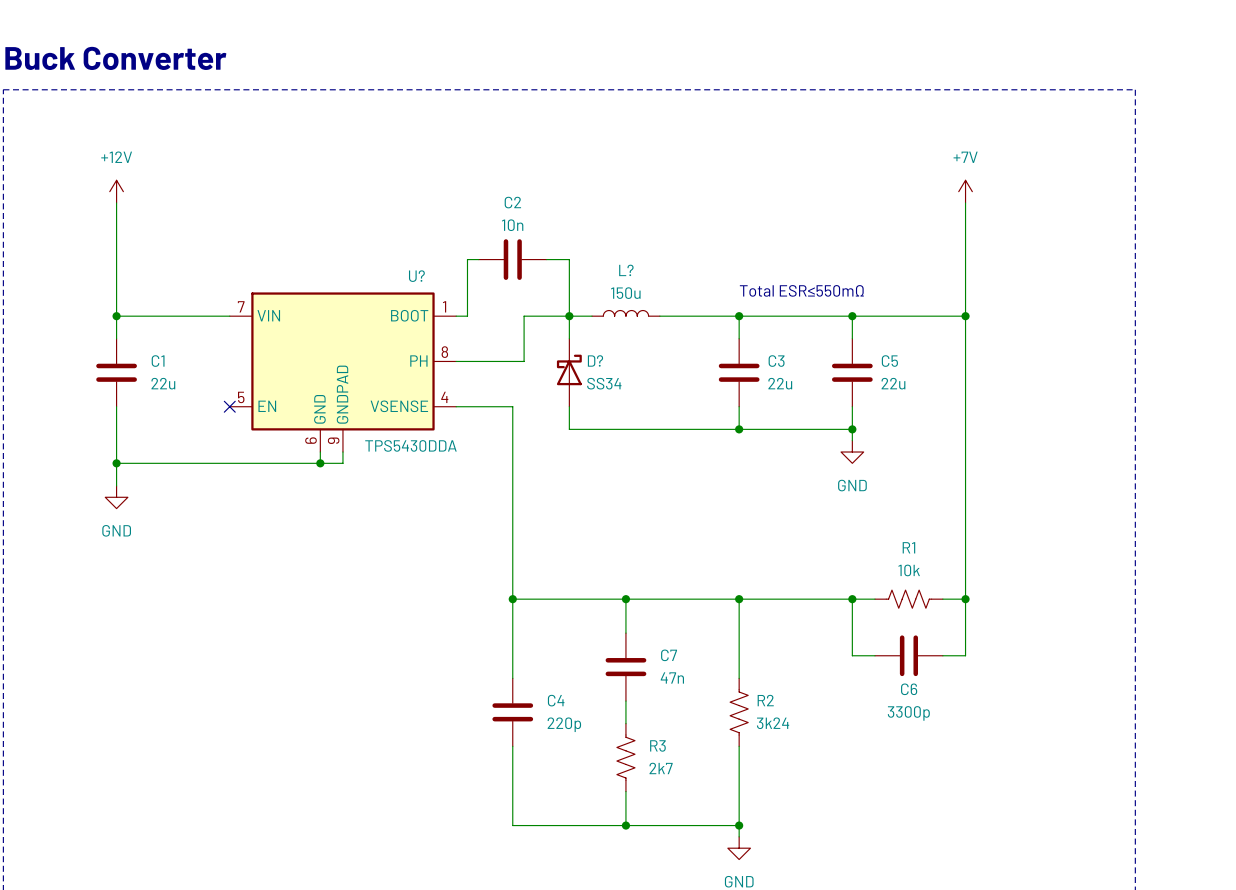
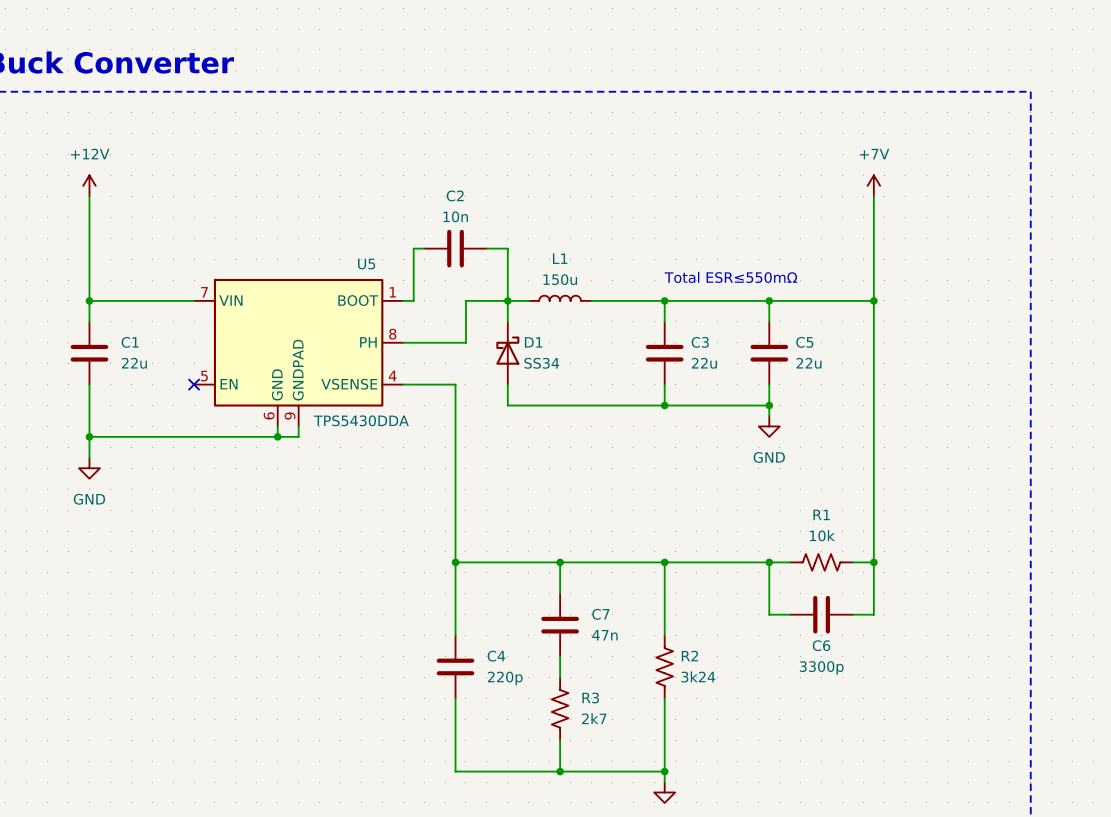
L? name: L? (626, 270) -> L1 (560, 258)
U? name: U? (416, 276) -> U5 (366, 264)
D? name: D? (595, 360) -> D1 (533, 342)

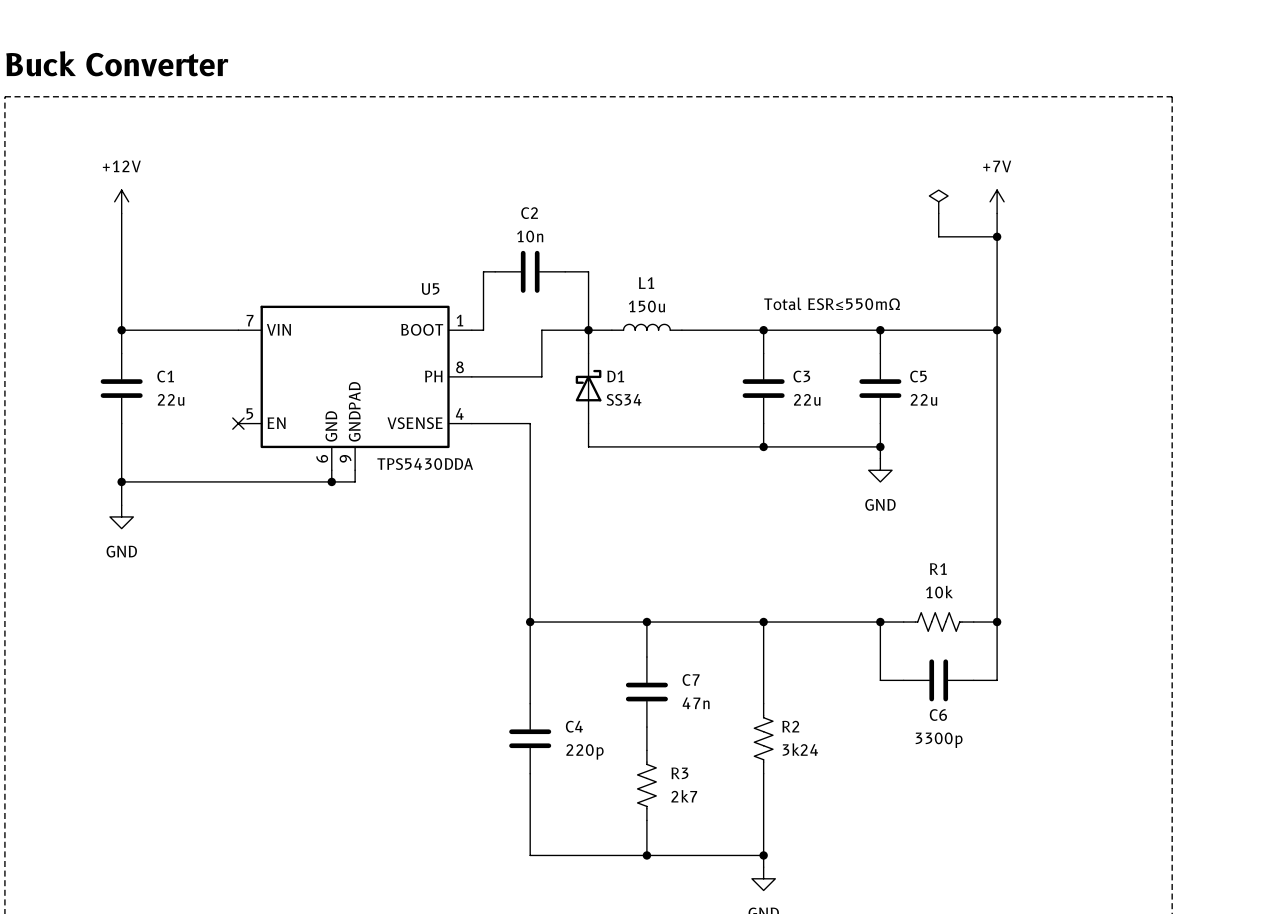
power symbol: none -> (938, 201)
wire: none -> (938, 213) (938, 236) (997, 236)
junction: none -> (997, 236)

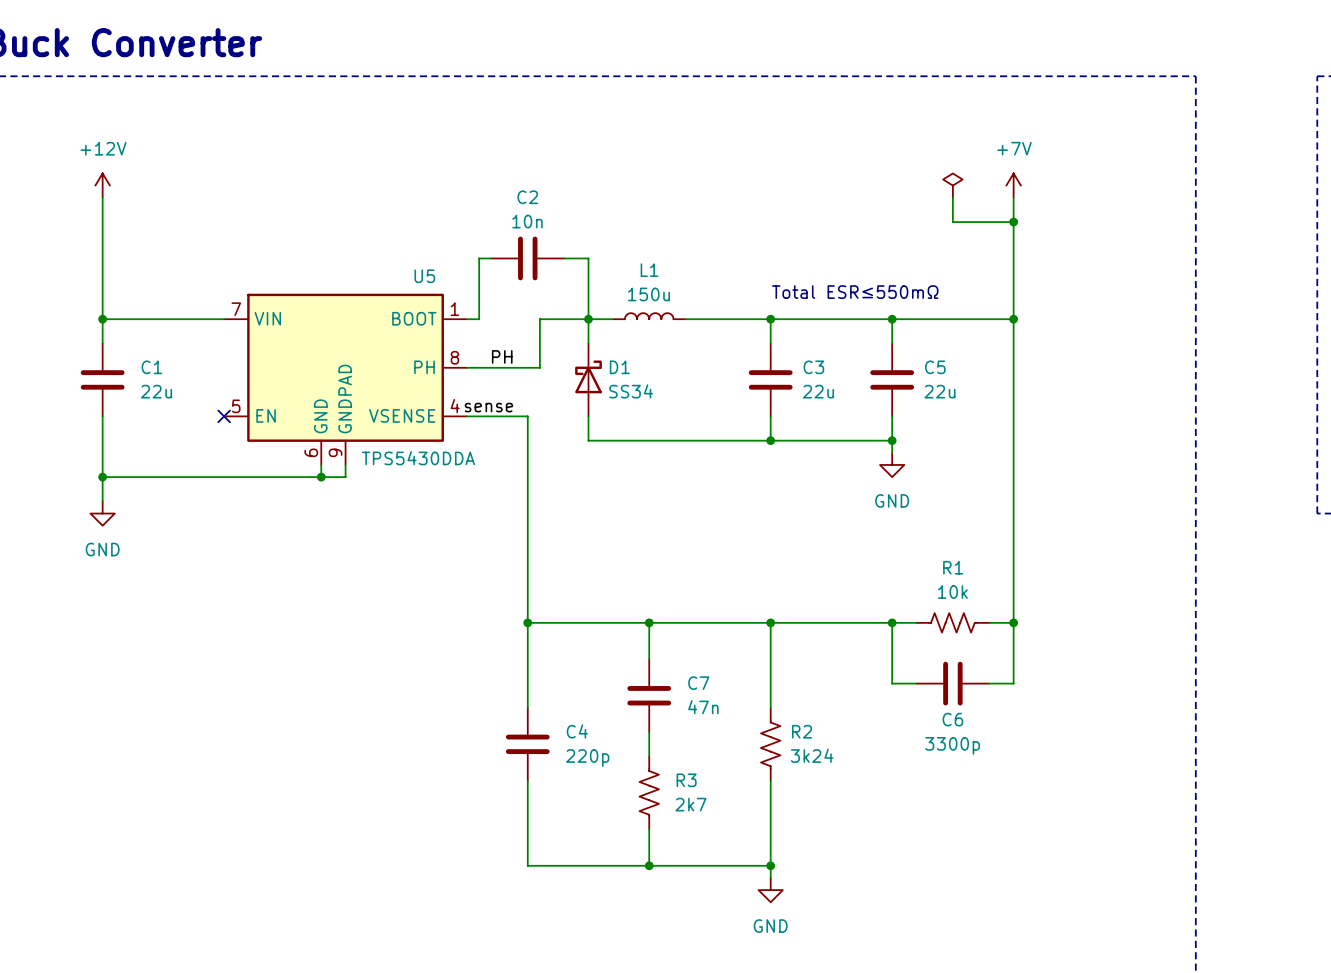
label: none -> PH (502, 356)
label: none -> sense (488, 407)

